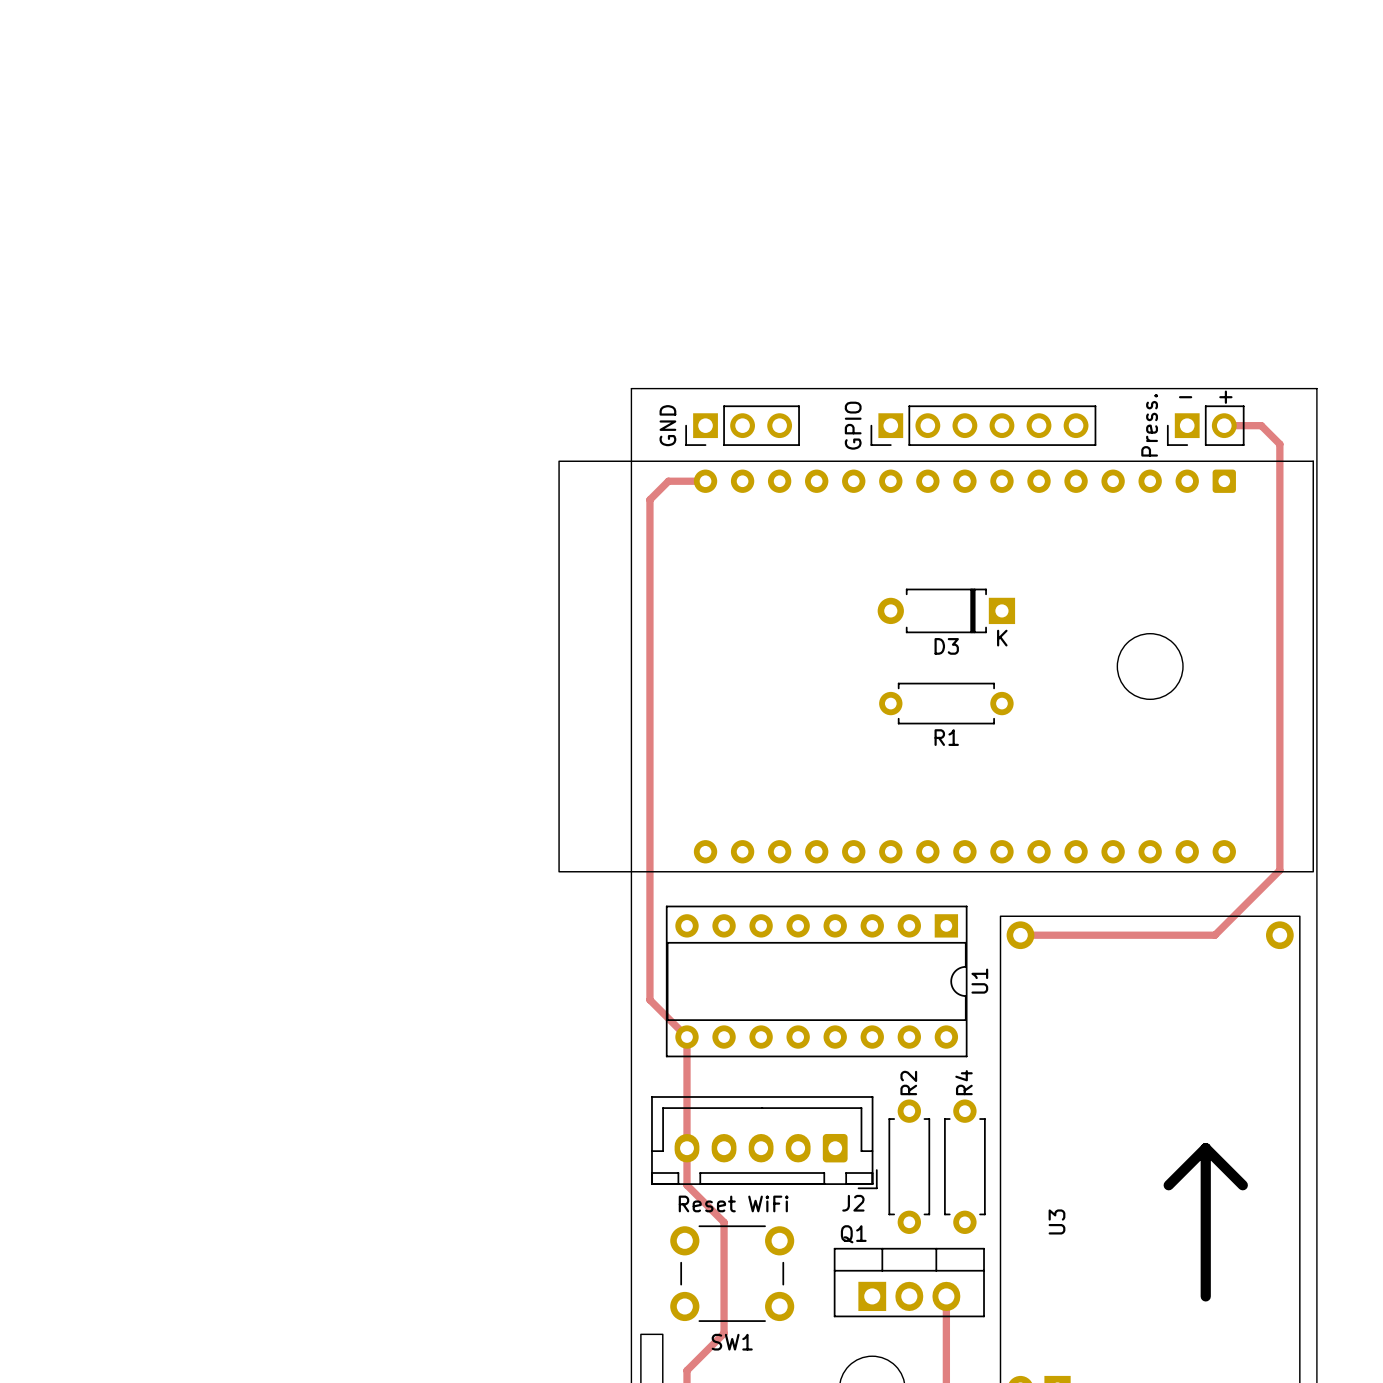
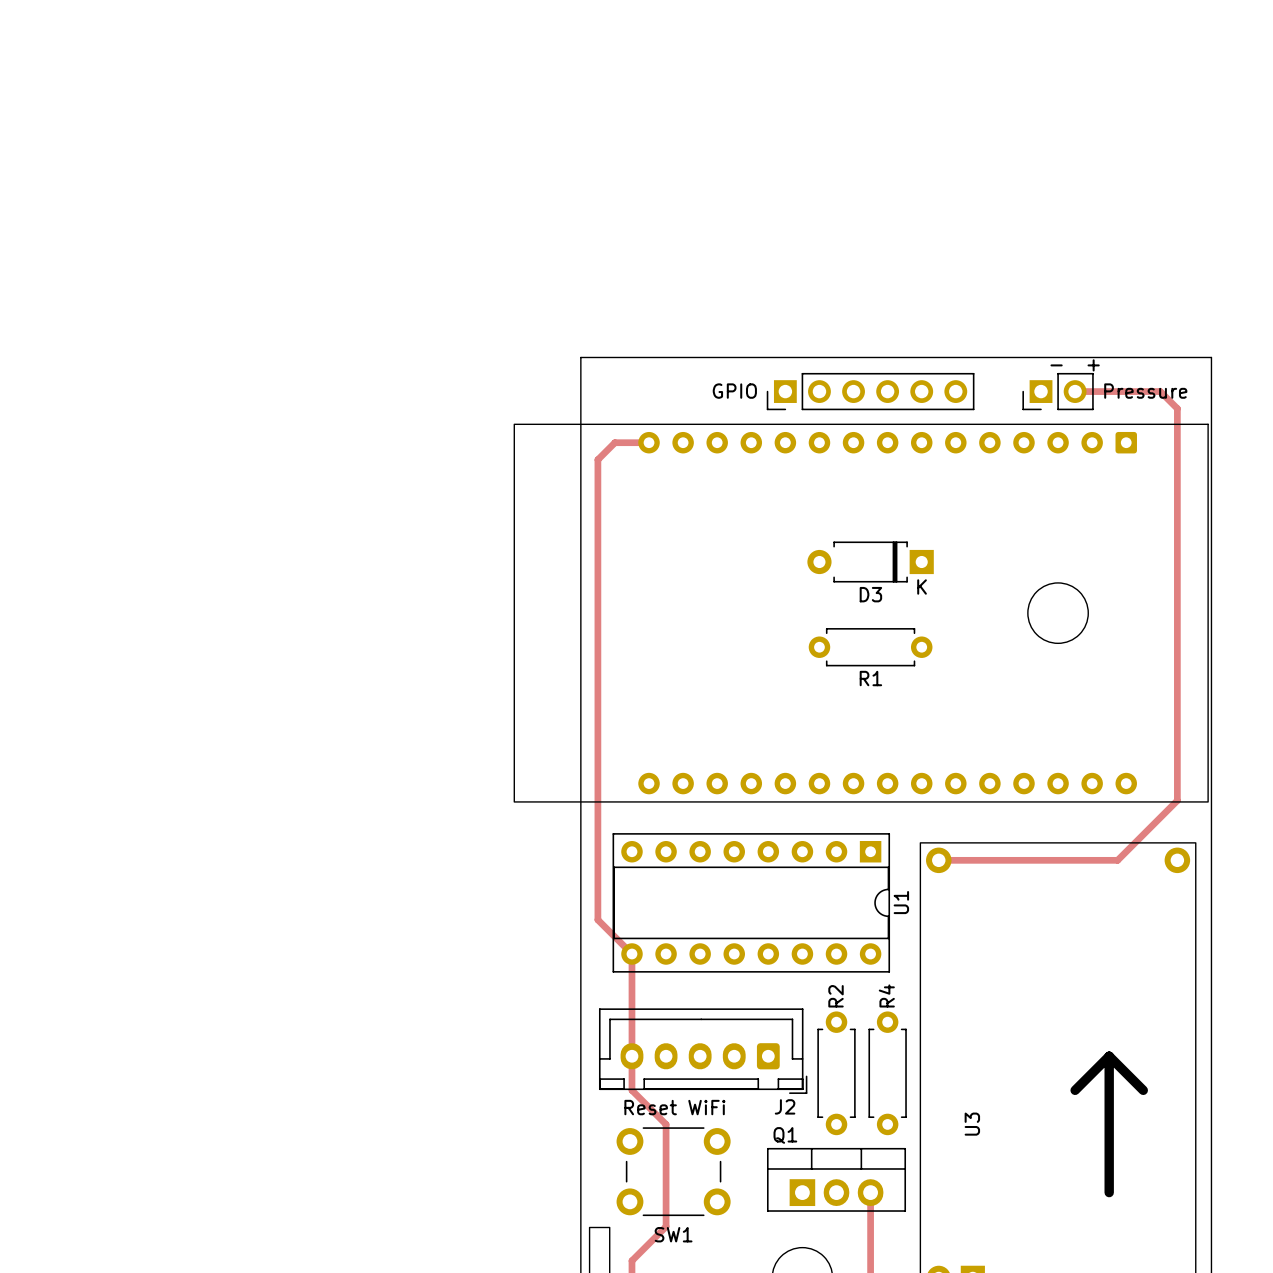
text position: - + (1205, 397) -> - + (1075, 365)
text: GND (667, 425) -> none
part: (742, 425) -> none
text rotation: 0° (853, 425) -> 90° clockwise (734, 391)
part position: (983, 425) -> (870, 391)
text: Press. (1149, 425) -> none
track: none -> (1075, 391) (1126, 391)
part position: (1205, 425) -> (1058, 391)
text: none -> Pressure (1145, 391)

